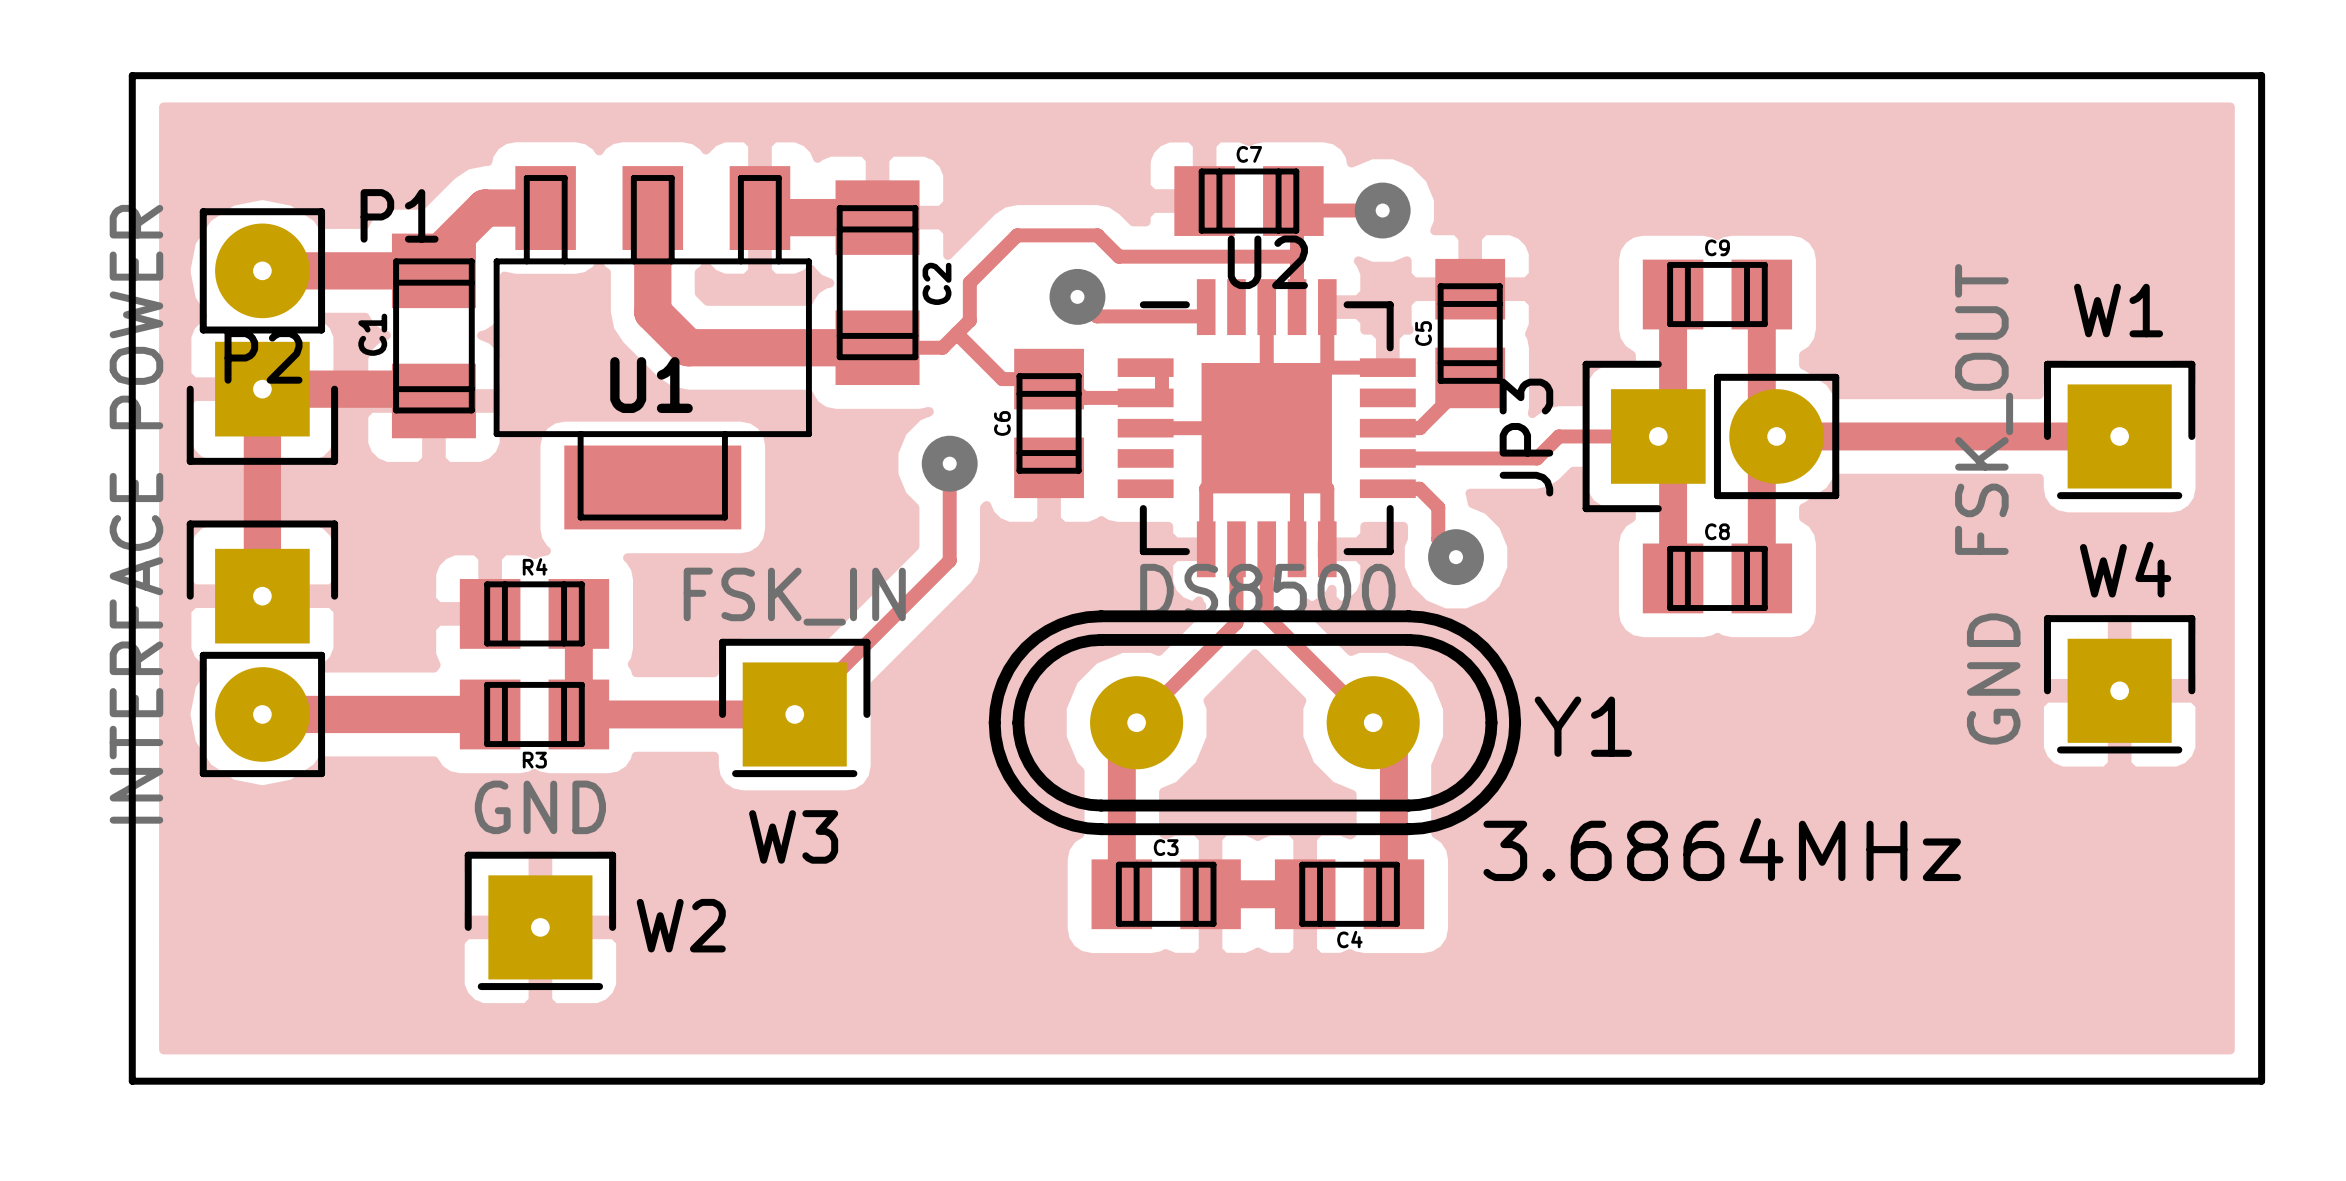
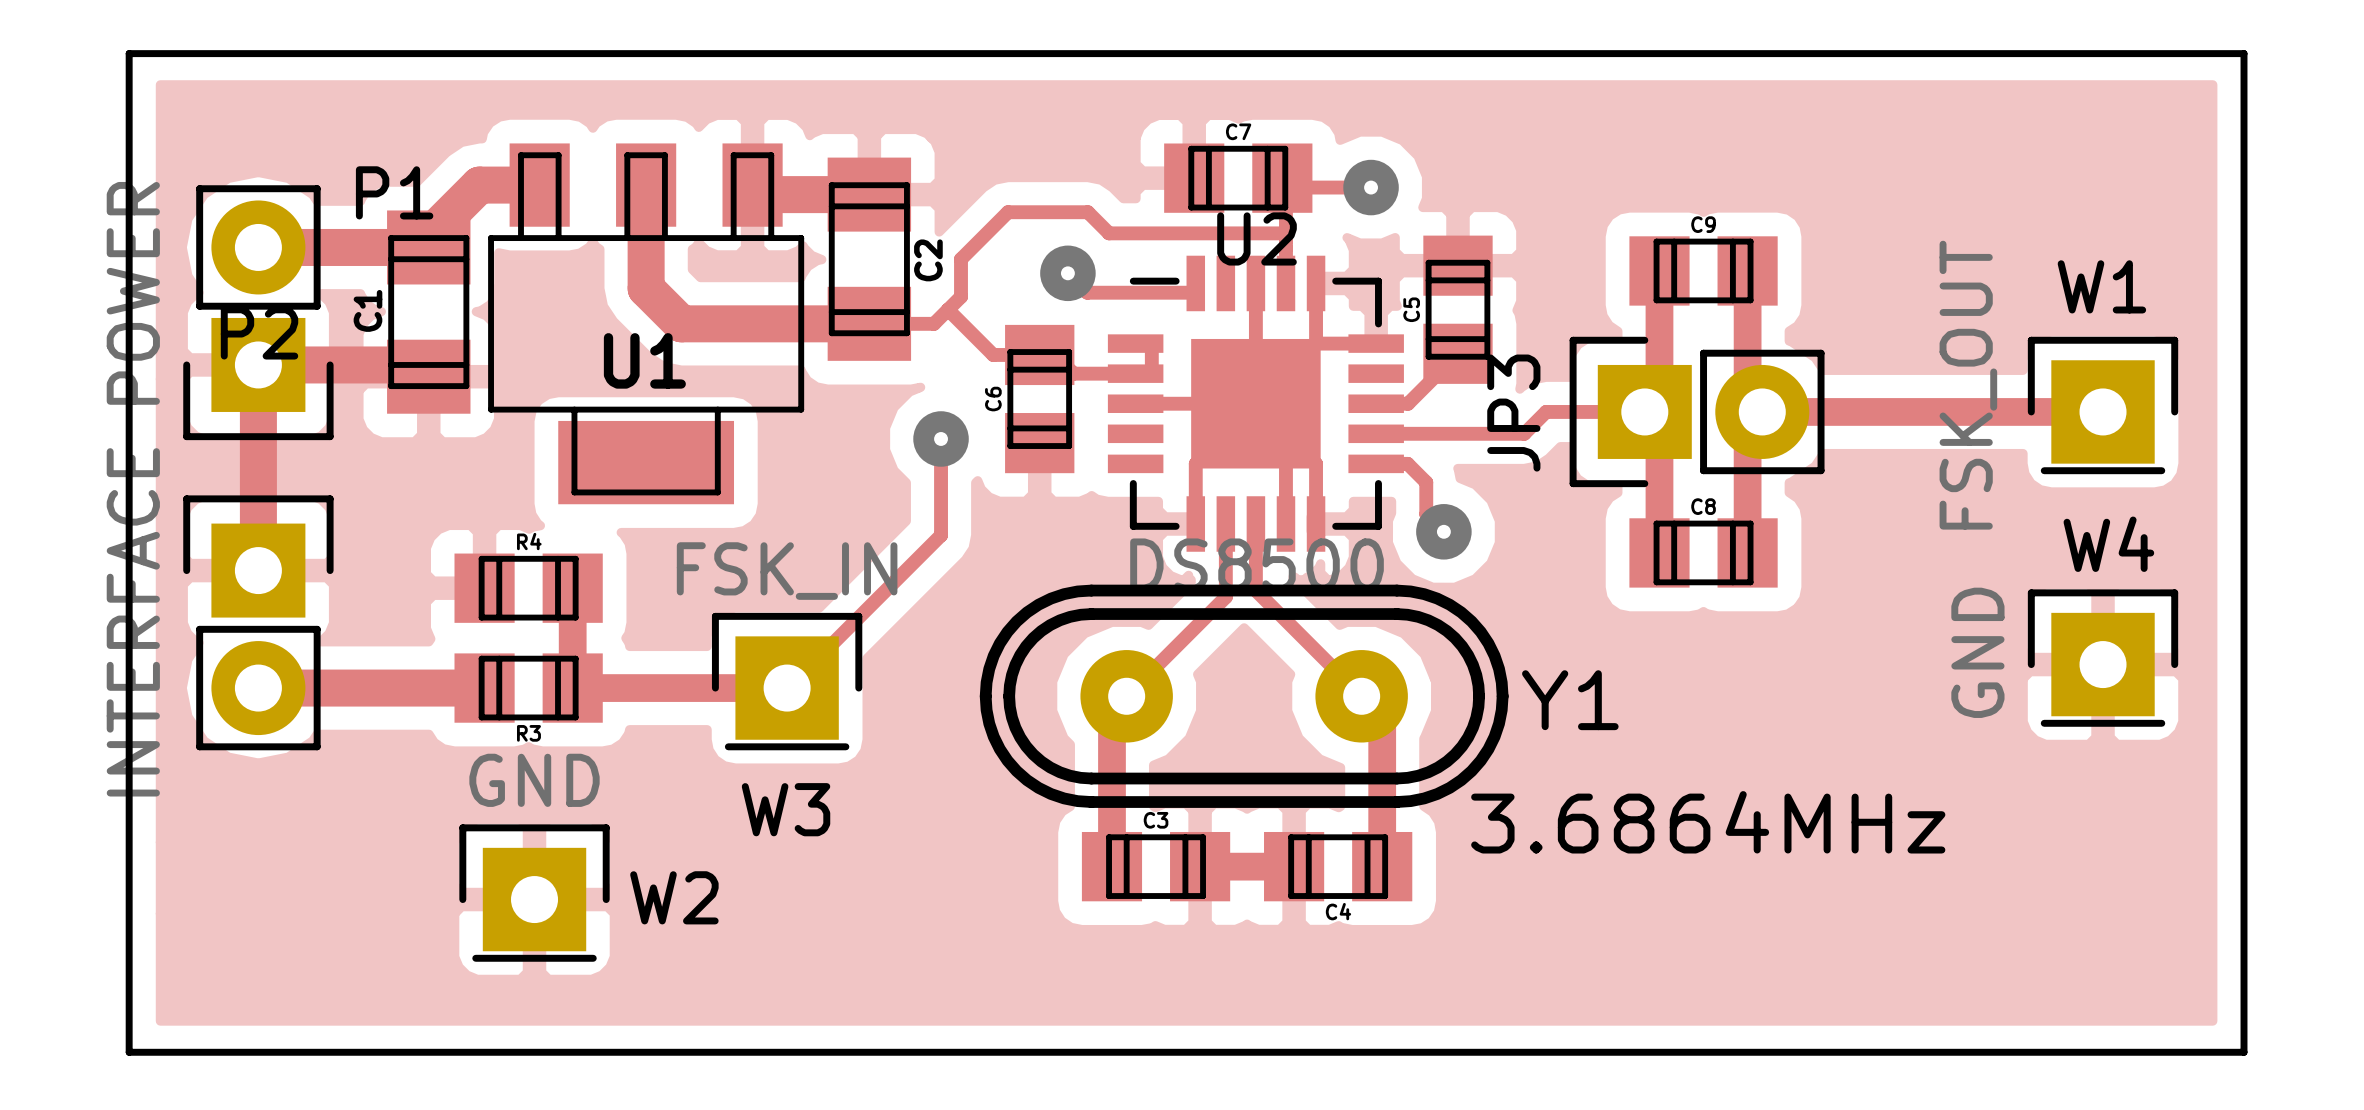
P1 footprint: [186, 208, 339, 465] -> [183, 185, 334, 441]
JP3 footprint: [1582, 360, 1840, 513] -> [1569, 336, 1825, 488]
W1 footprint: [2043, 360, 2196, 500] -> [2027, 336, 2179, 475]
P2 footprint: [186, 520, 339, 778] -> [183, 495, 334, 751]
Y1 footprint: [988, 610, 1522, 836] -> [979, 584, 1509, 808]
W4 footprint: [2043, 615, 2196, 754] -> [2027, 589, 2179, 727]
W3 footprint: [719, 638, 871, 778] -> [711, 612, 863, 751]
W2 footprint: [464, 851, 617, 991] -> [459, 824, 610, 962]

